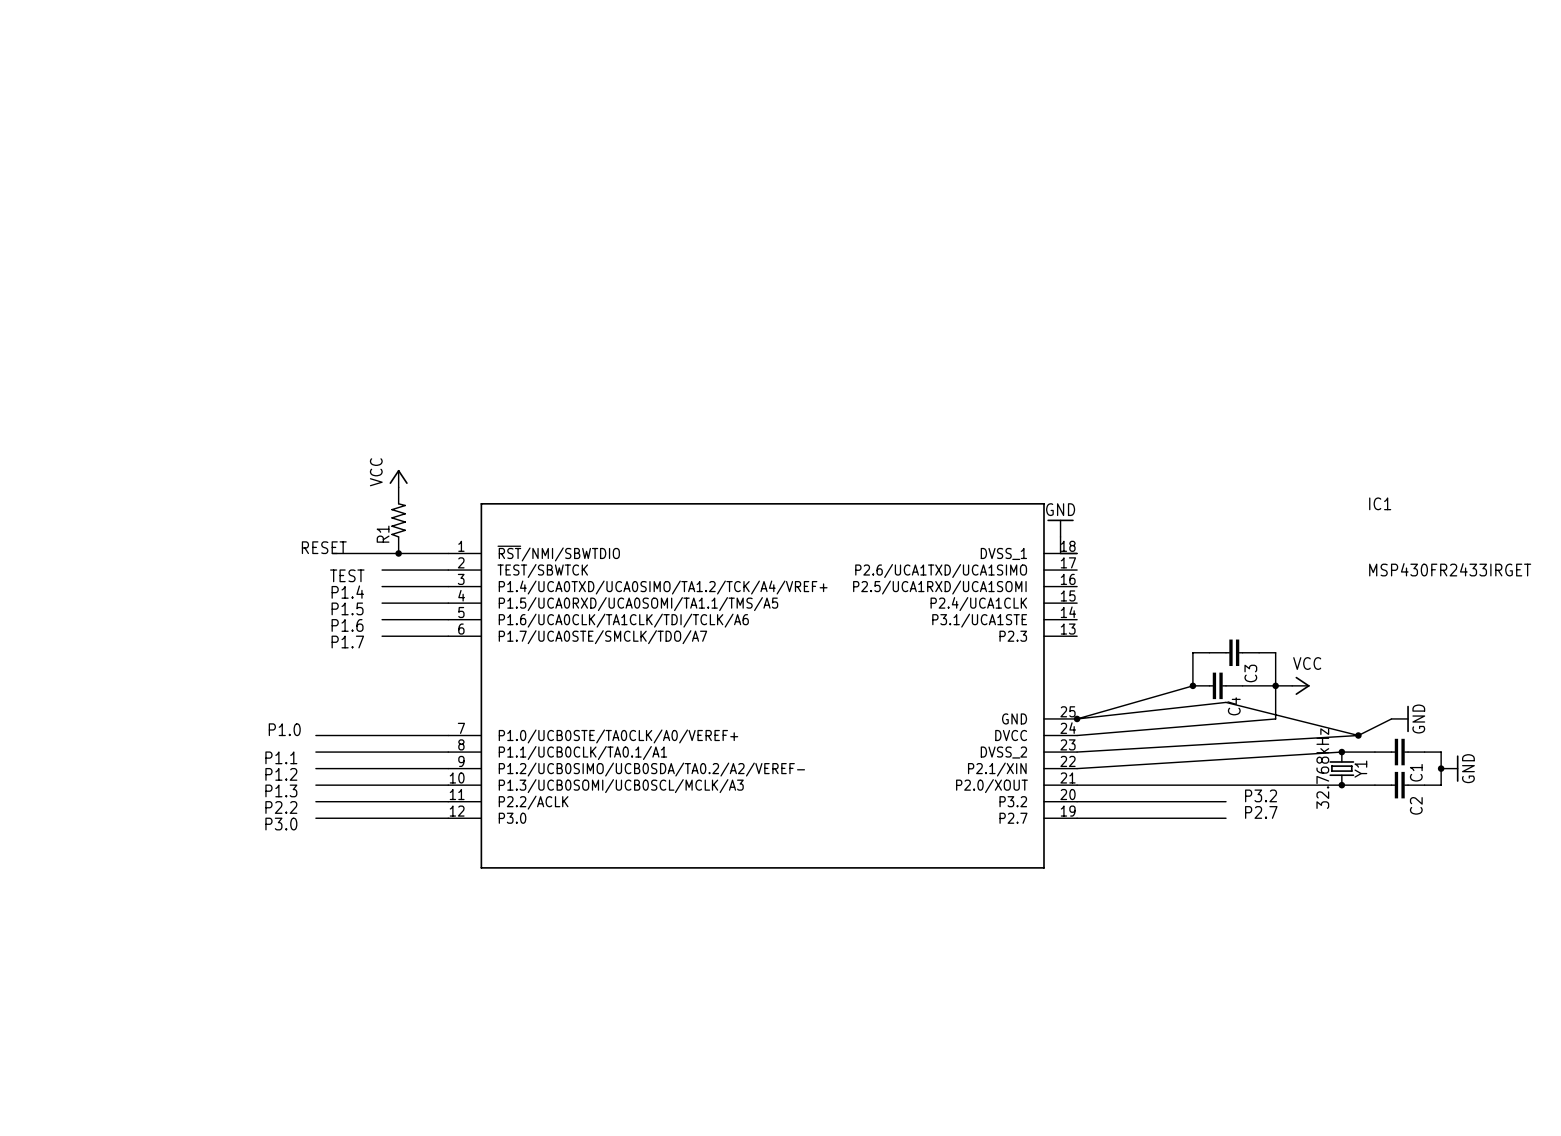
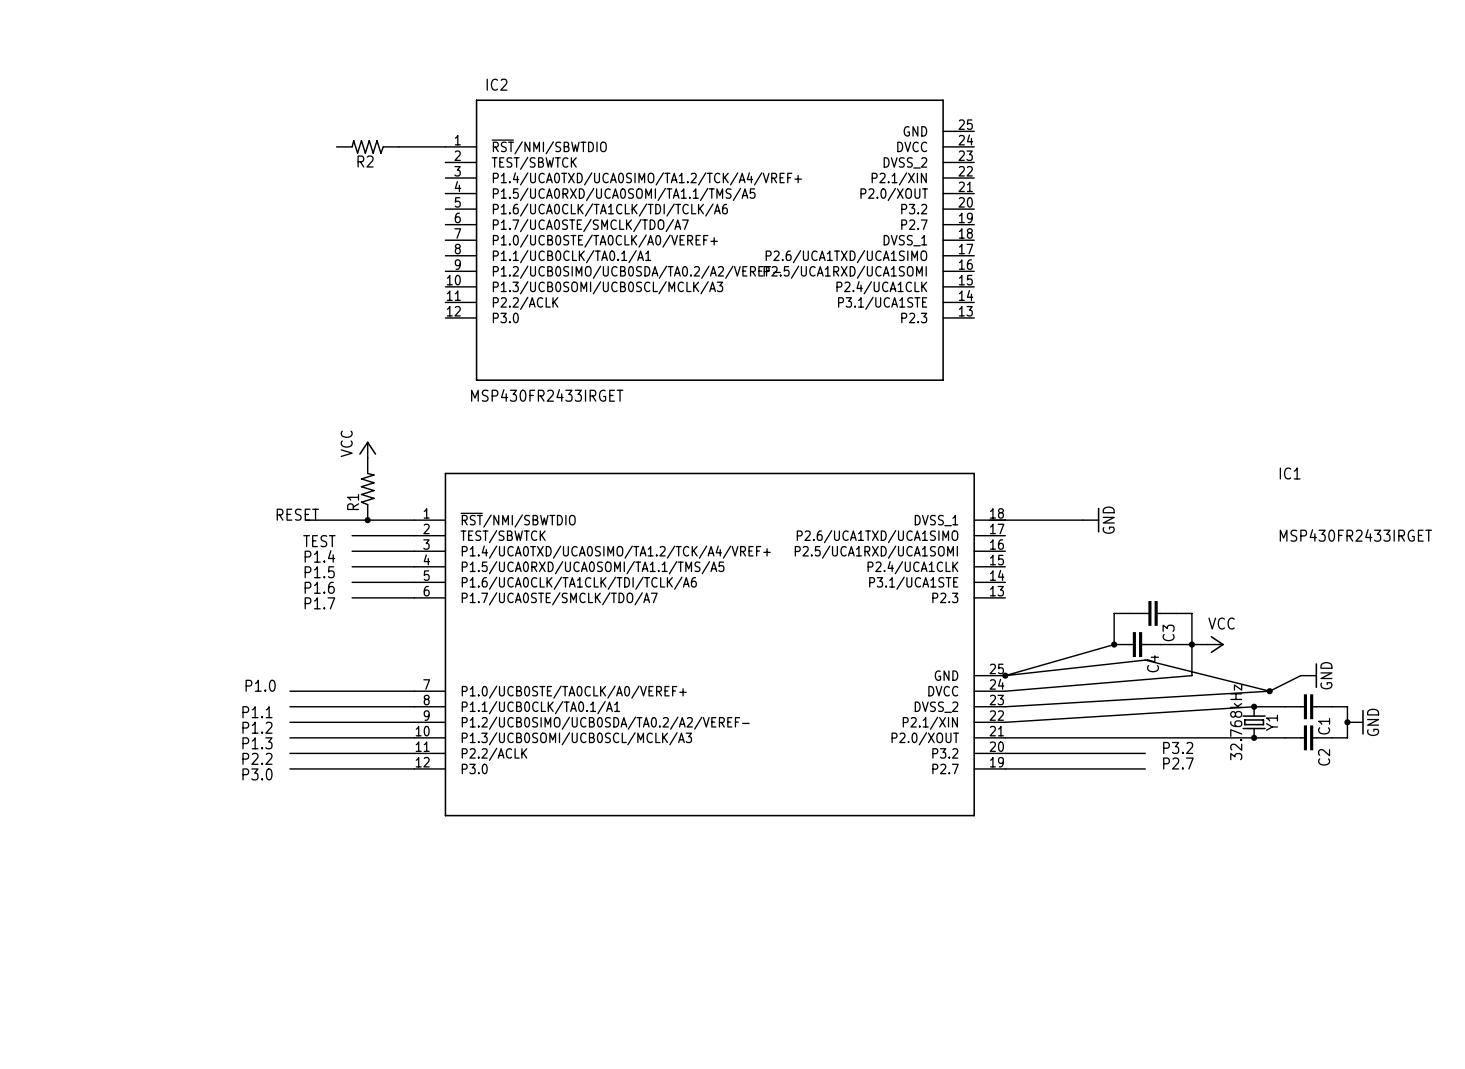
R2: none -> (367, 146)
wire: none -> (398, 146) (445, 146)
IC2: none -> MSP430FR2433IRGET (709, 240)
power symbol rotation: 0° (1060, 520) -> 90° clockwise (1098, 520)
power symbol position: GND (1060, 528) -> GND (1091, 520)
wire: (1060, 536) (1060, 553) -> none
wire: none -> (1005, 520) (1083, 520)

